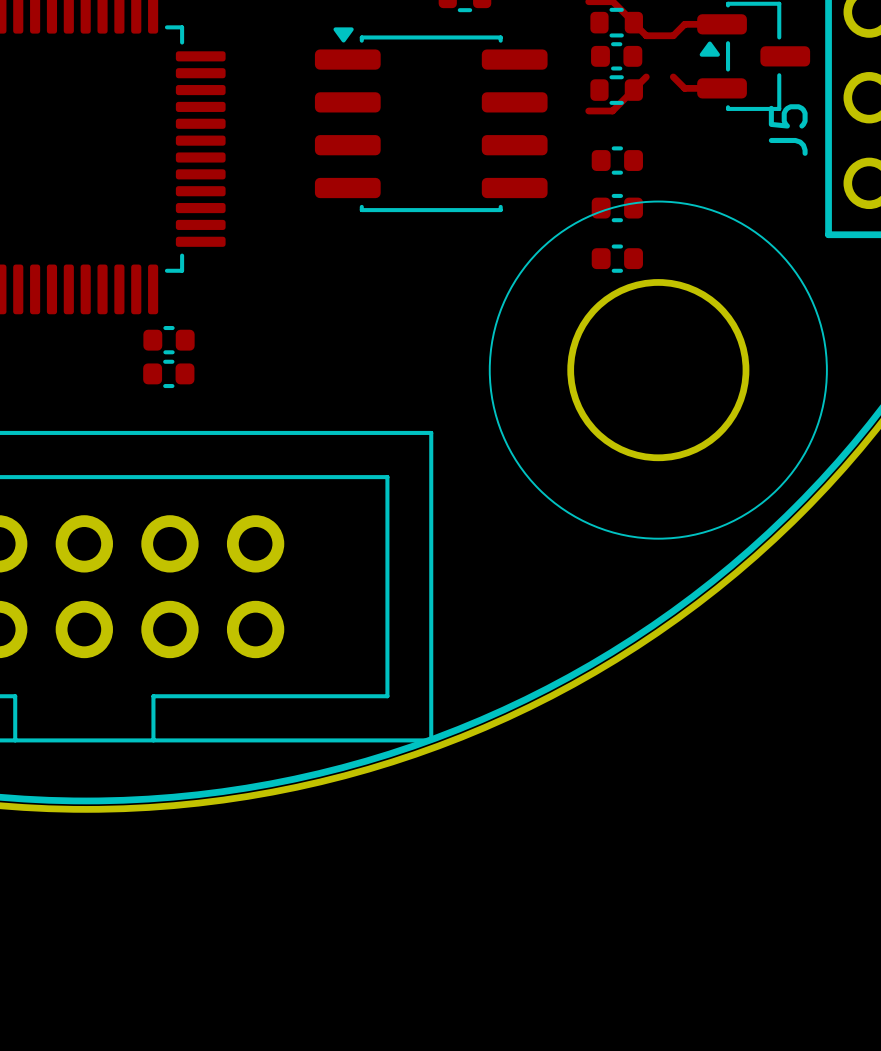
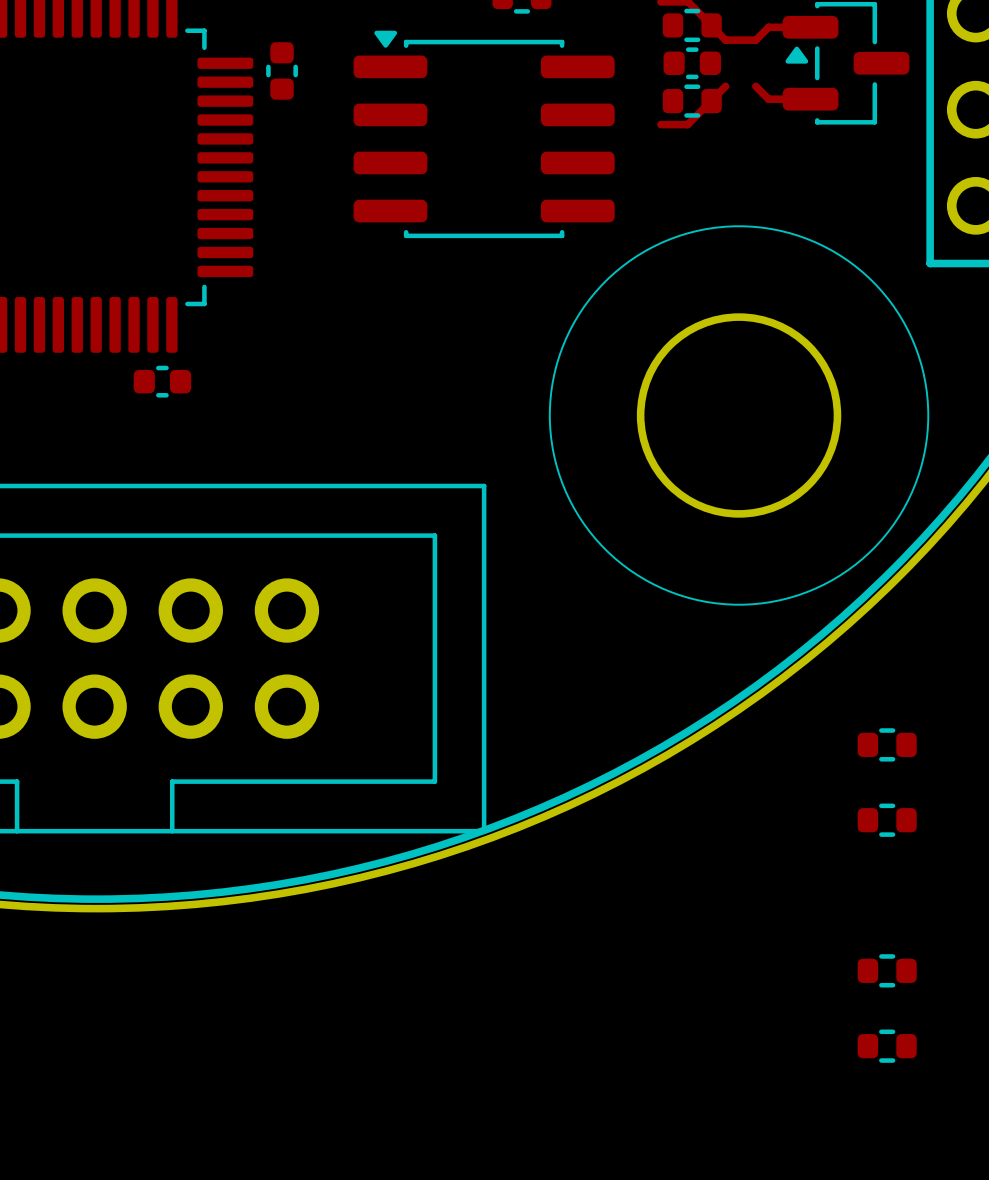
part: none -> (282, 70)
J5 name: J5 (788, 130) -> none
part: (617, 160) -> none
part: (617, 208) -> none
part: (617, 258) -> none
part: none -> (162, 381)
part: (169, 340) -> none
part: (168, 373) -> none
part: none -> (887, 744)
part: none -> (887, 820)
part: none -> (887, 970)
part: none -> (887, 1046)

